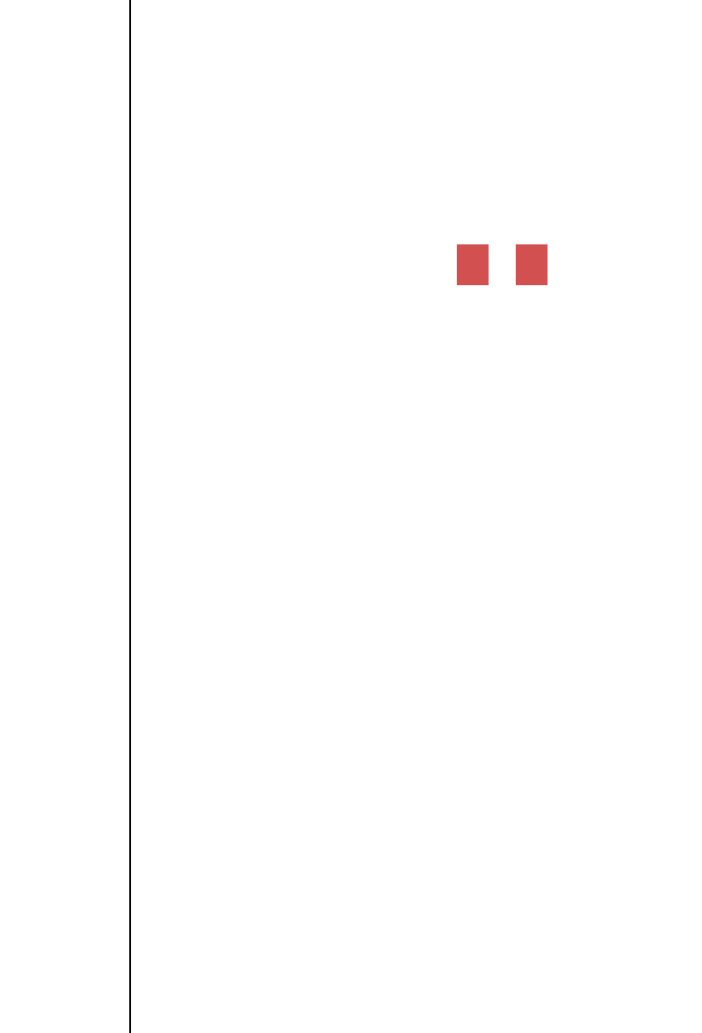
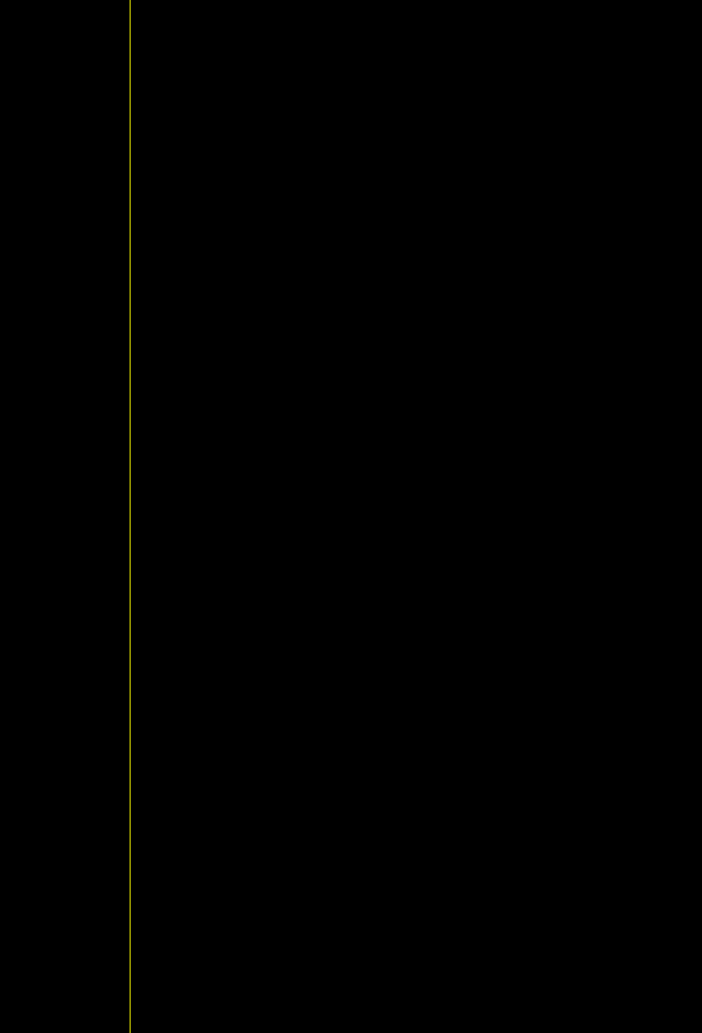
part: (502, 264) -> none

